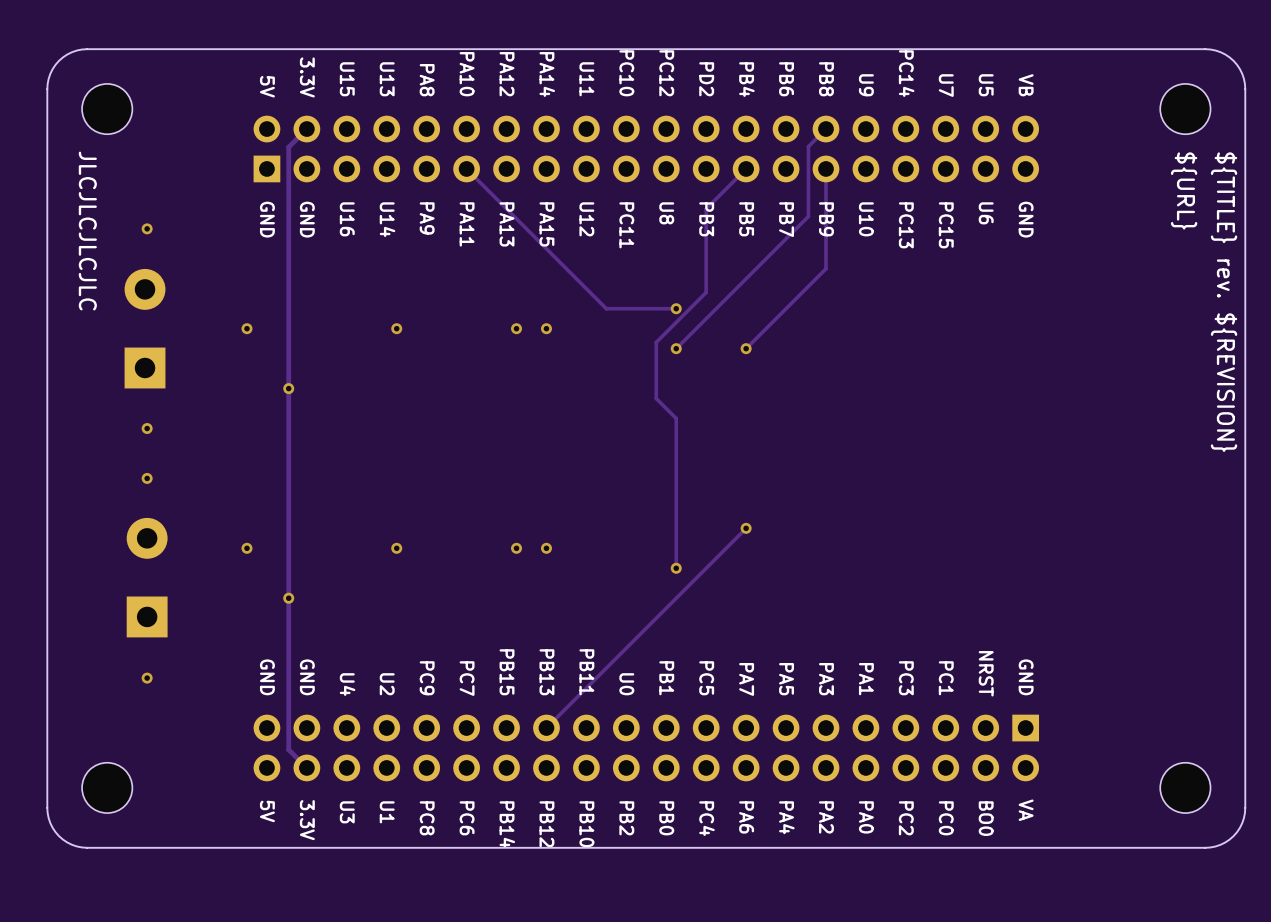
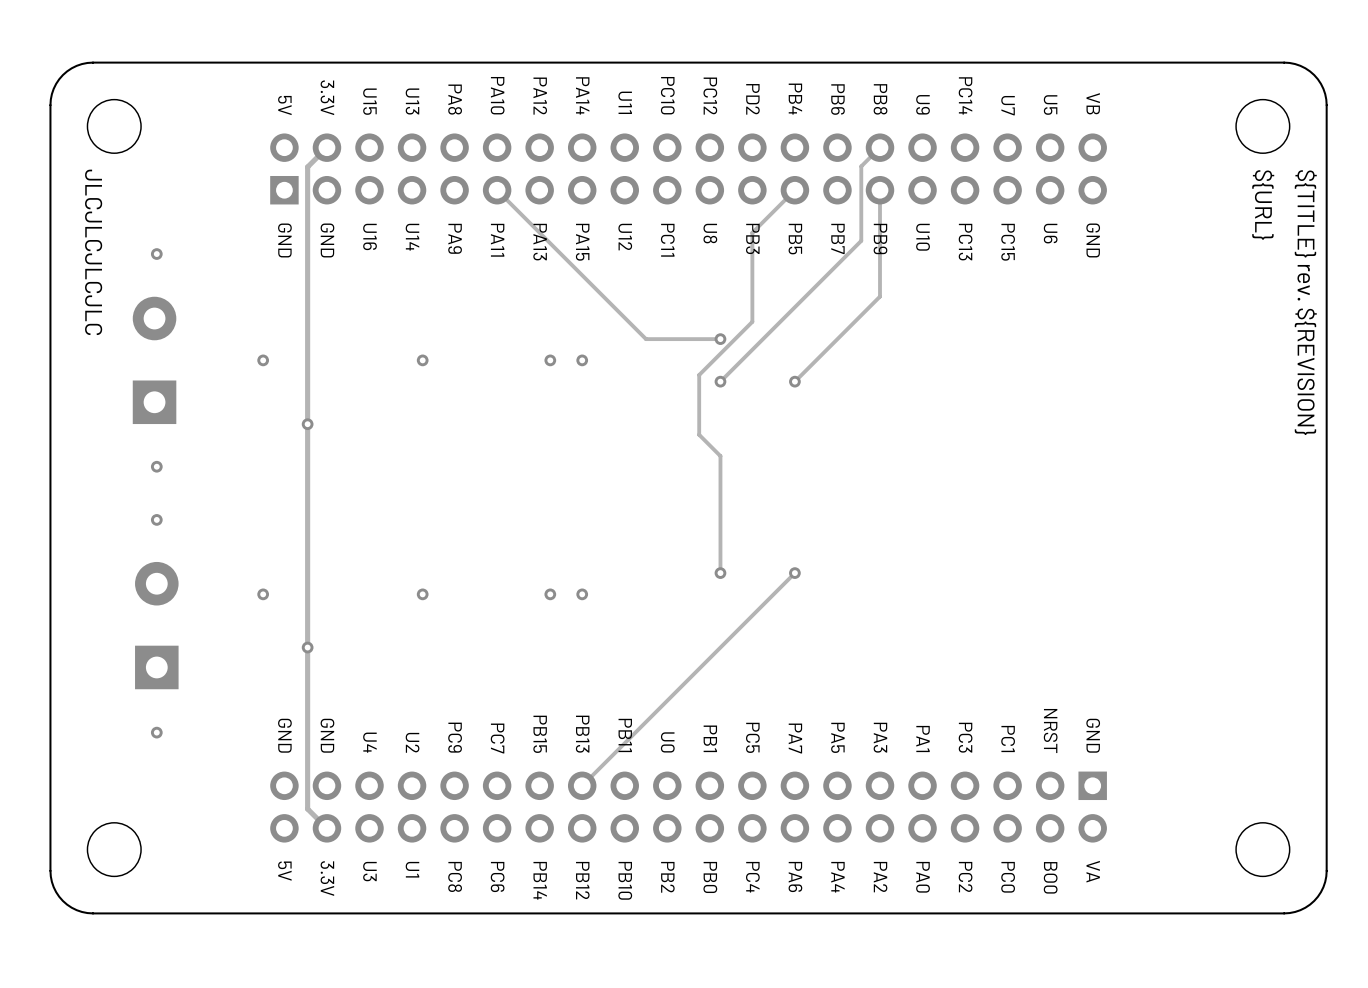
track: (676, 528) (676, 568) -> none
via position: (676, 568) -> (720, 573)

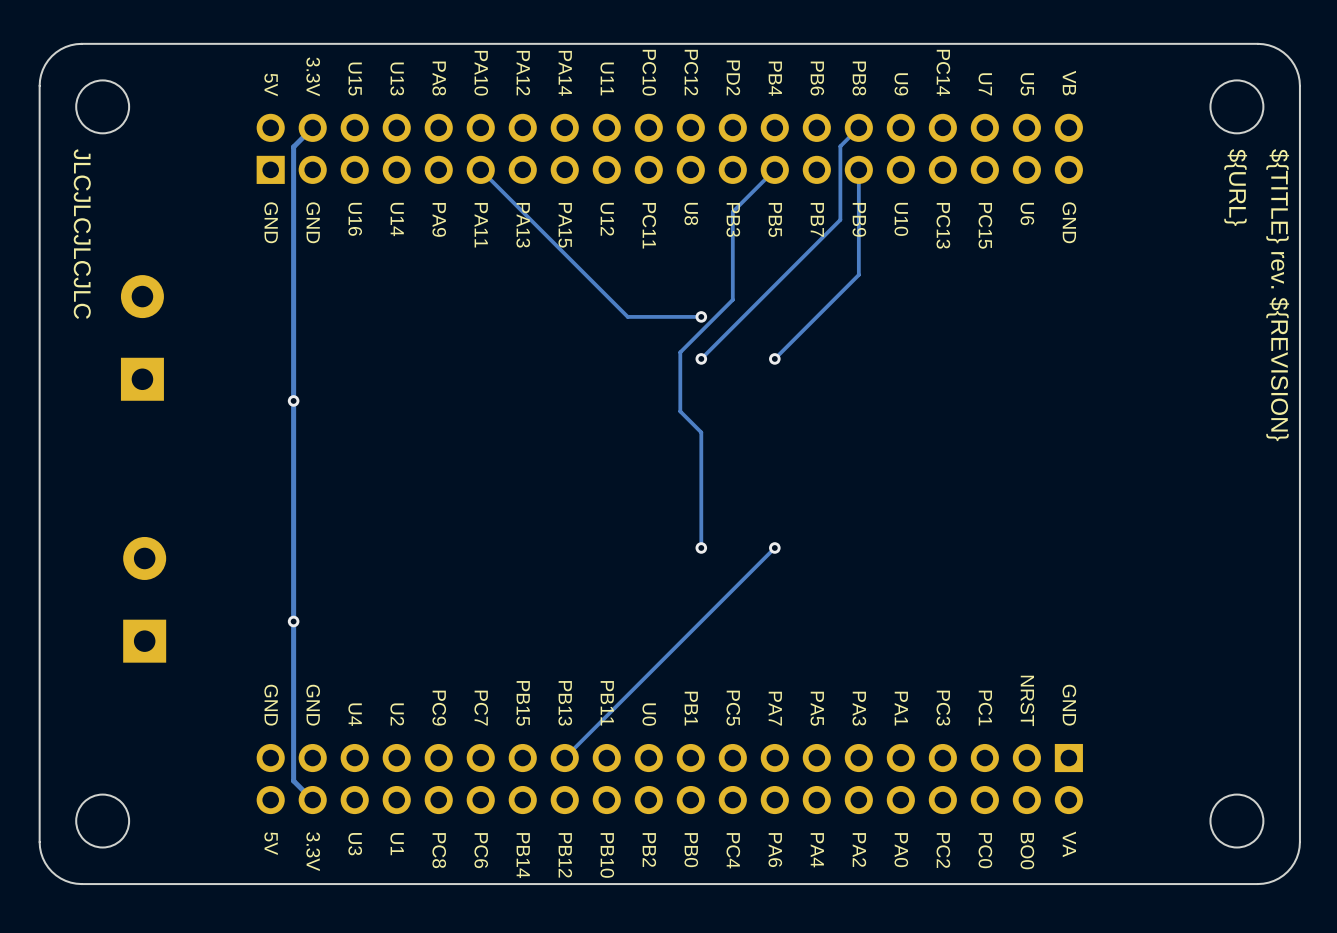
via: (156, 254) -> none
via: (263, 360) -> none
via: (422, 360) -> none
via: (550, 360) -> none
via: (582, 360) -> none
via: (156, 466) -> none
via: (156, 519) -> none
via: (263, 594) -> none
via: (422, 594) -> none
via: (550, 594) -> none
via: (582, 594) -> none
via: (156, 732) -> none

